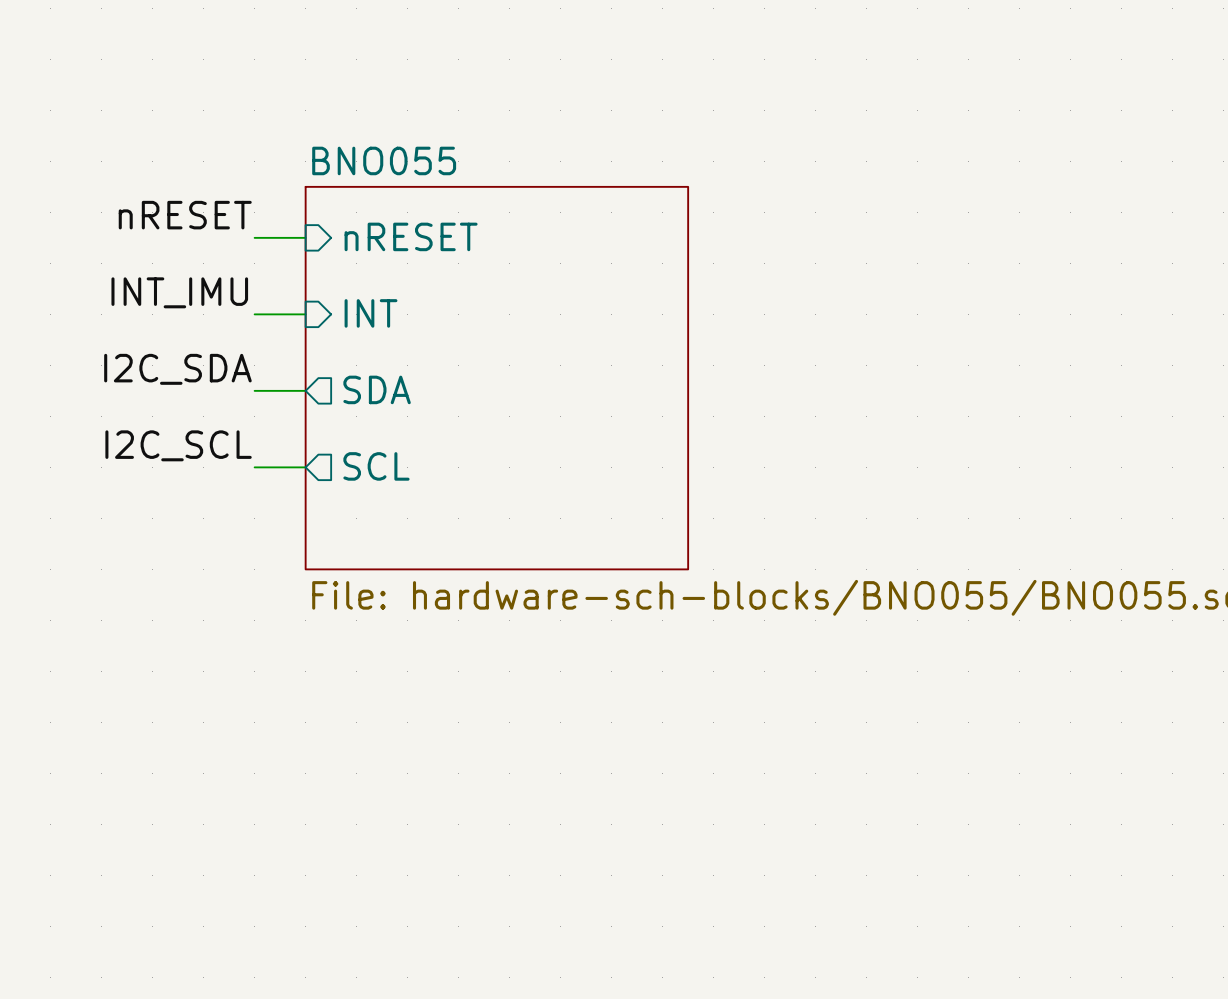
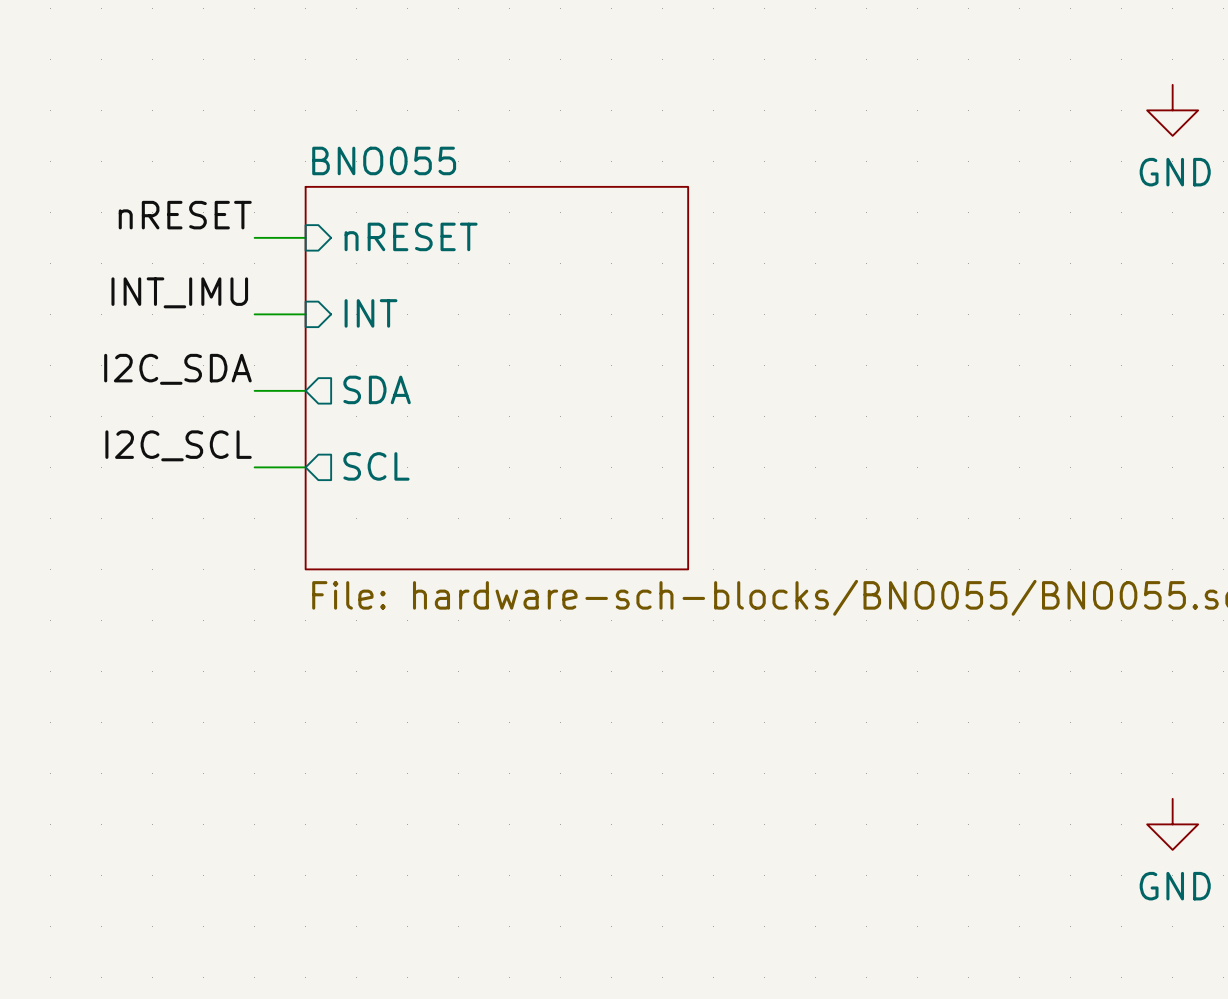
power symbol: none -> GND (1172, 110)
power symbol: none -> GND (1172, 824)

